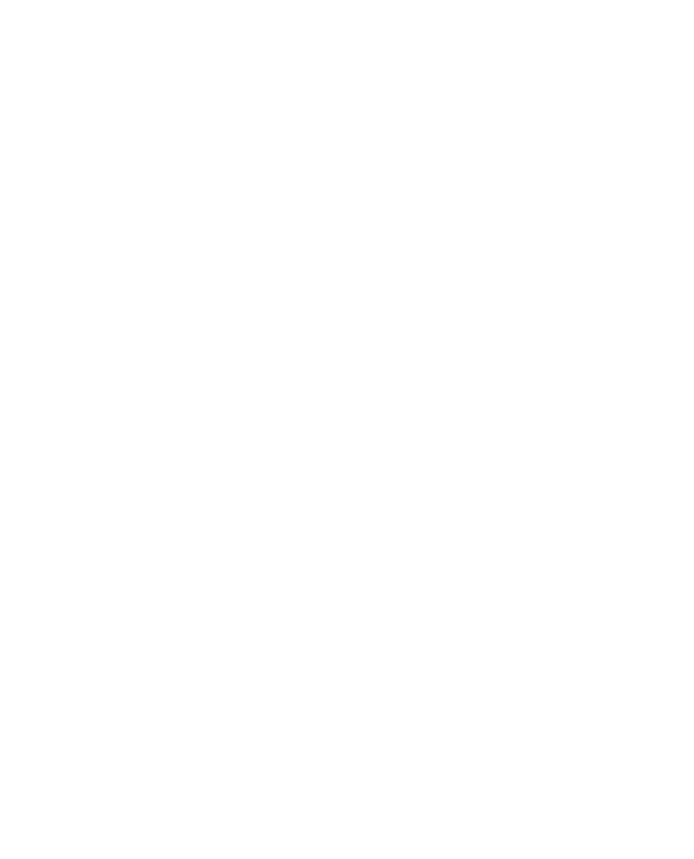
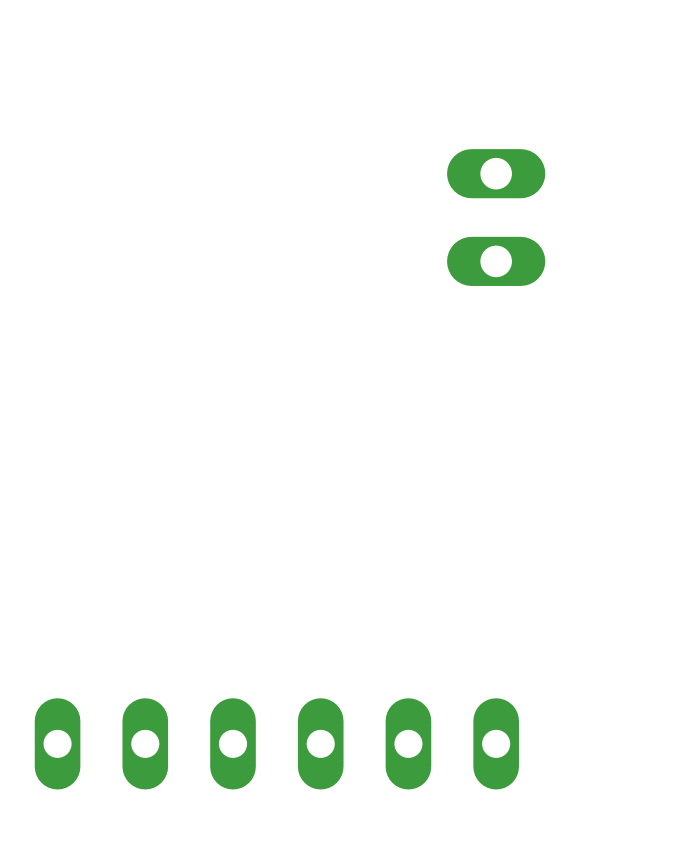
part: none -> (496, 217)
part: none -> (276, 743)

